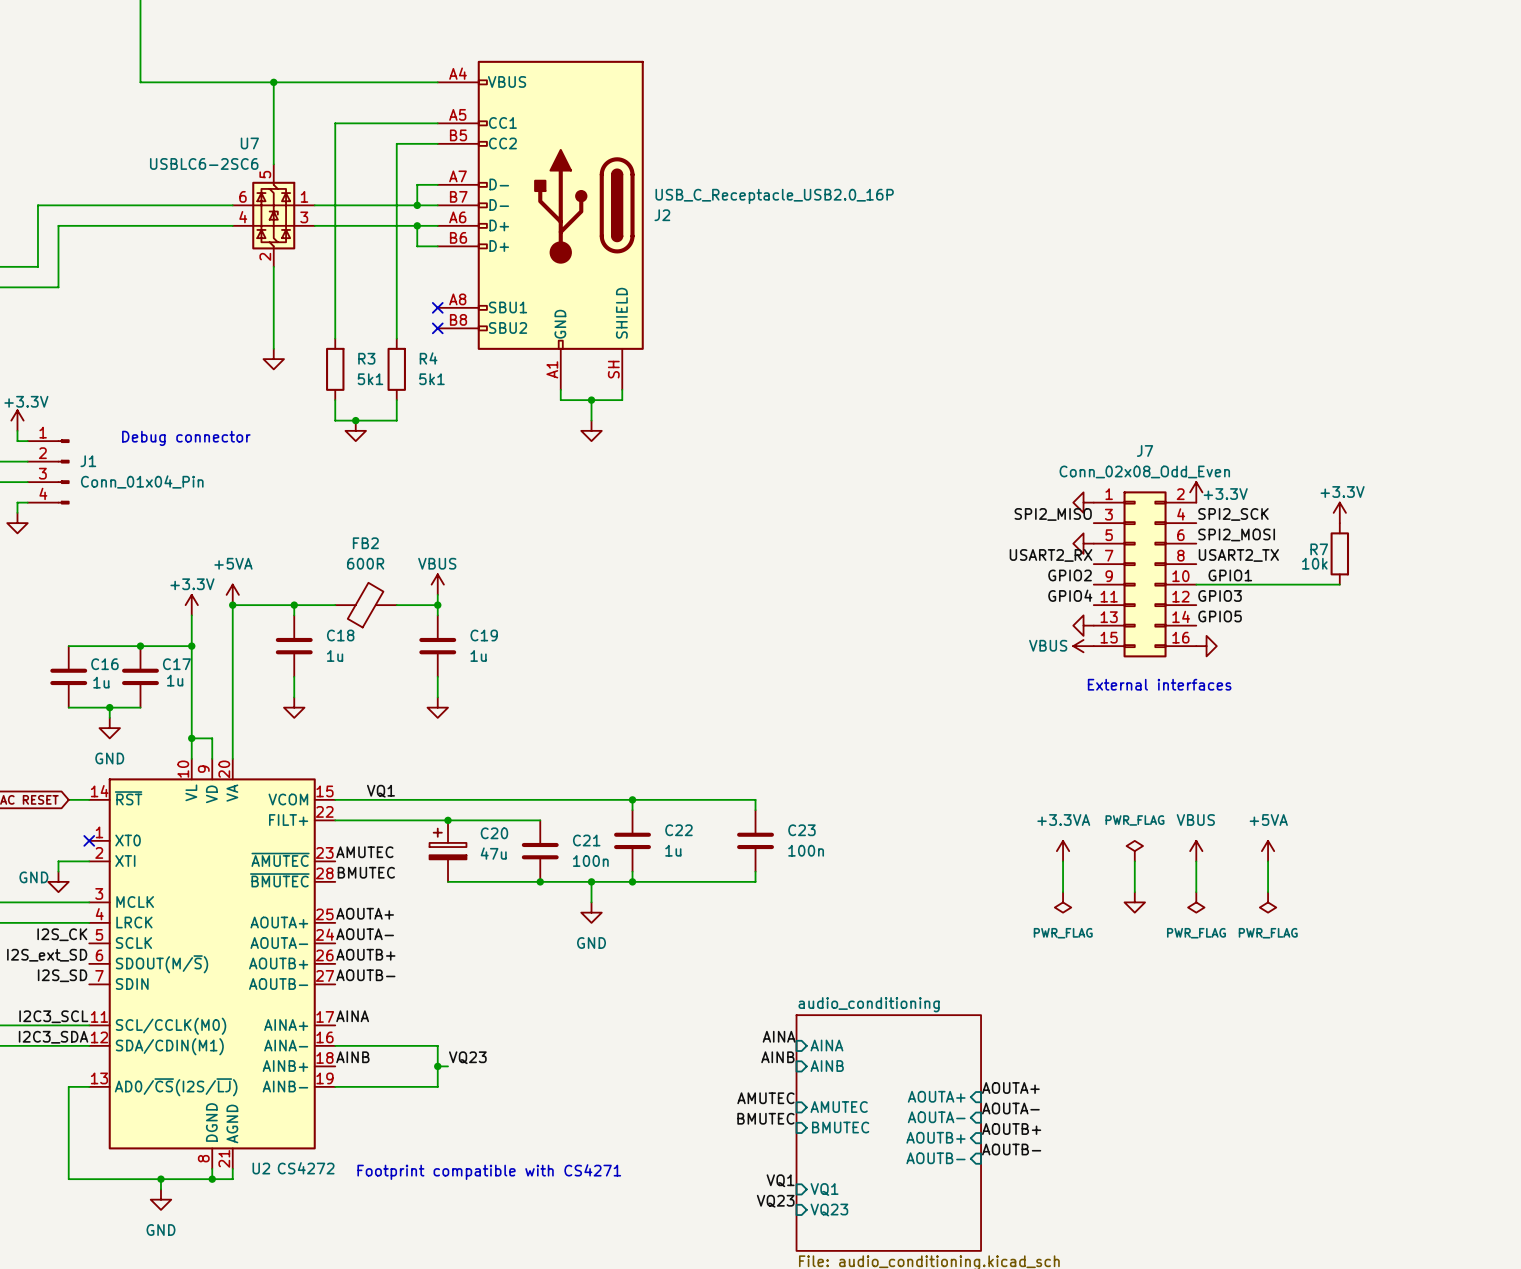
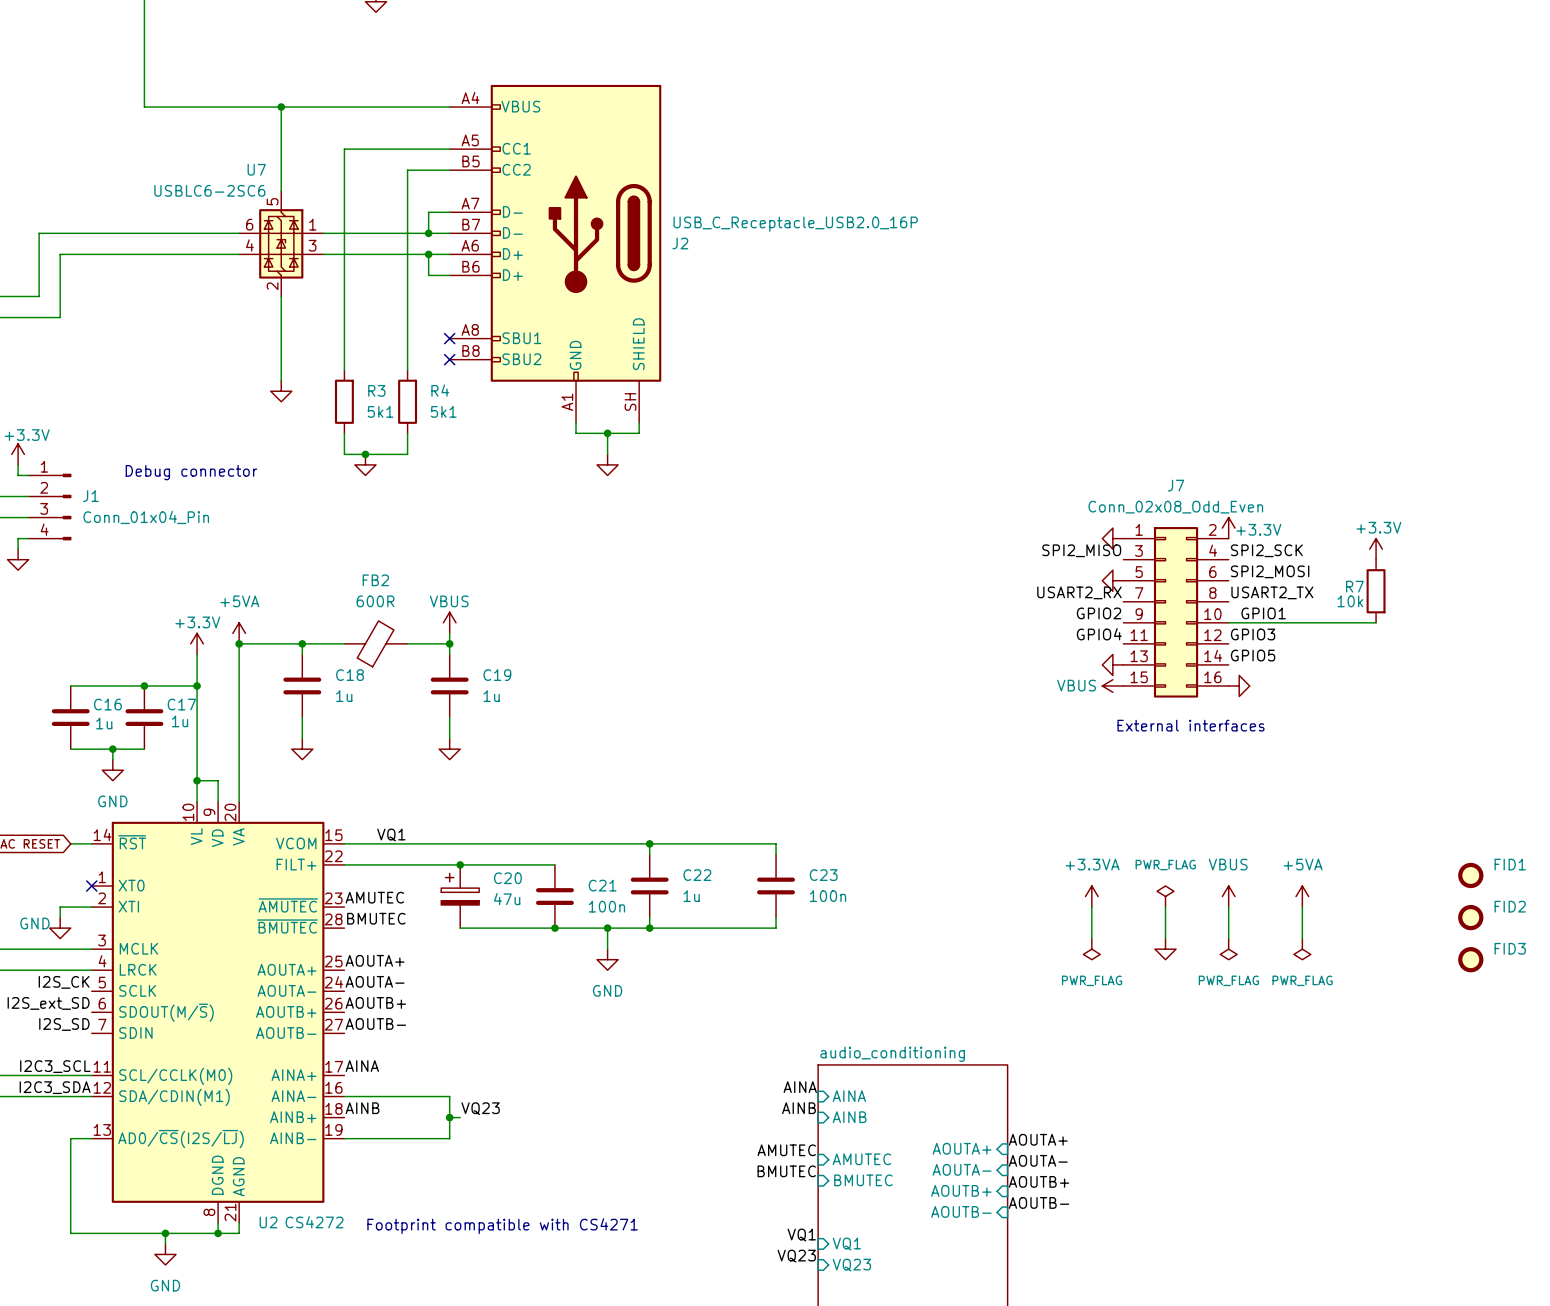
FID1: none -> (1470, 875)
FID2: none -> (1470, 917)
FID3: none -> (1470, 959)

